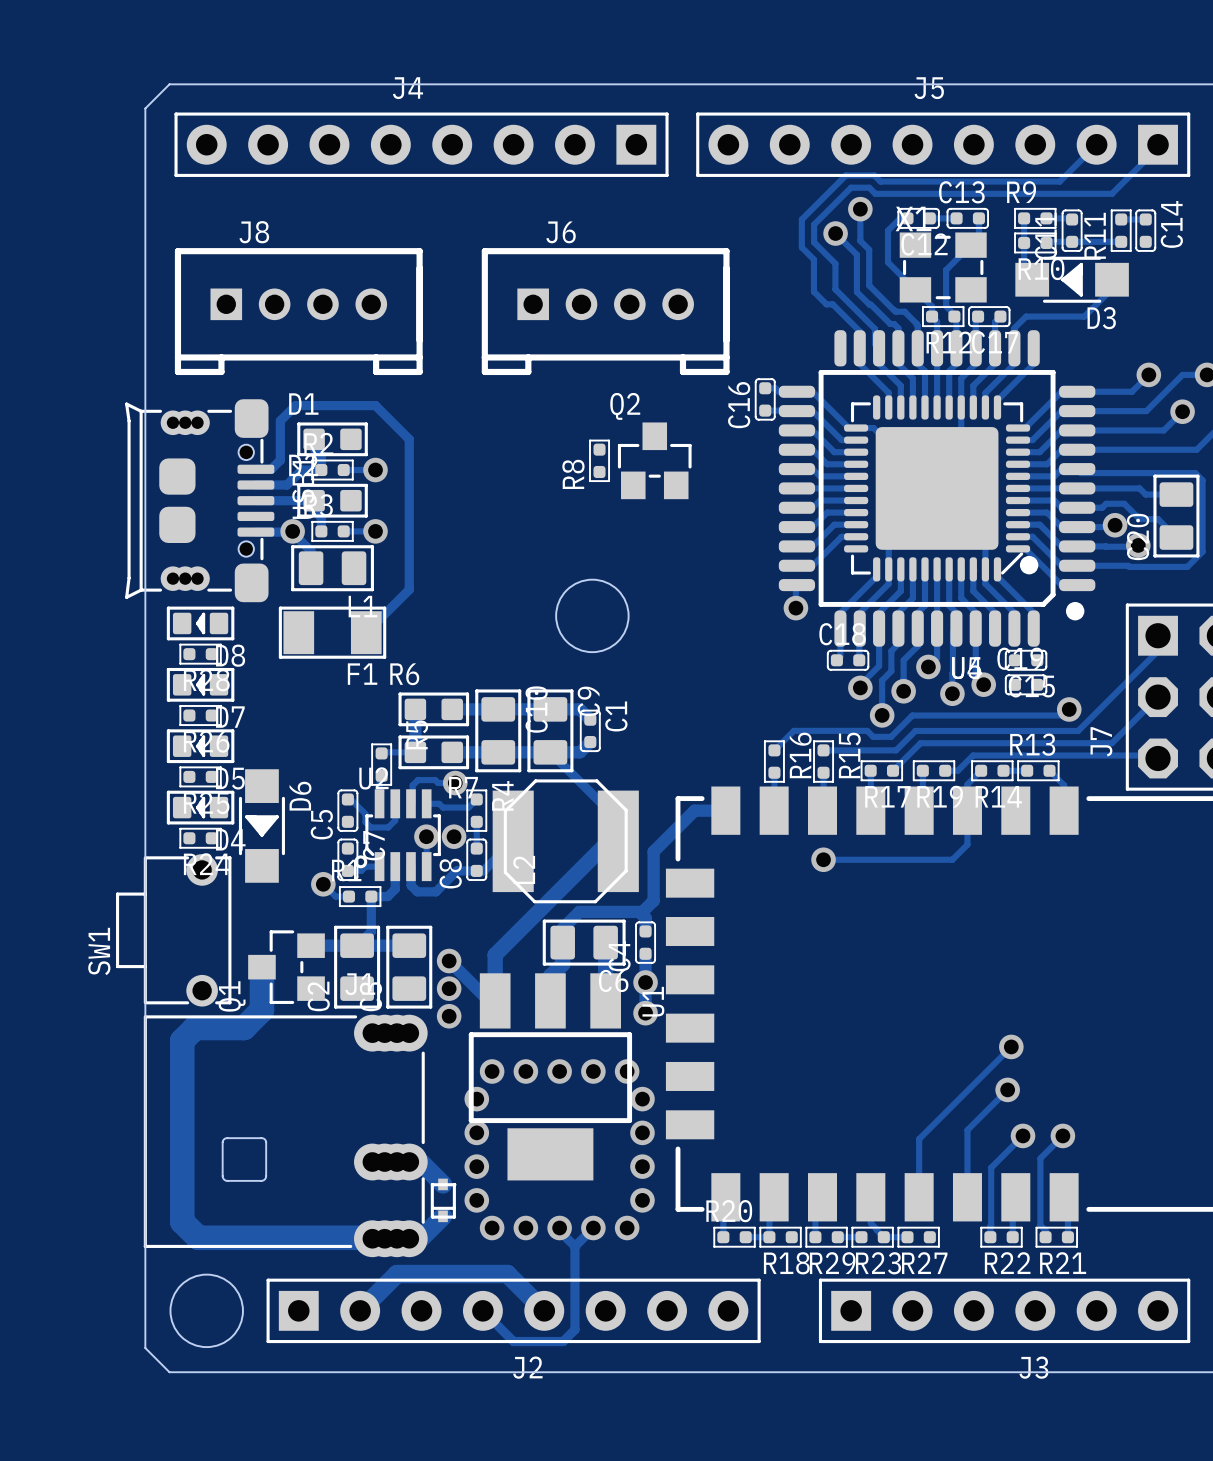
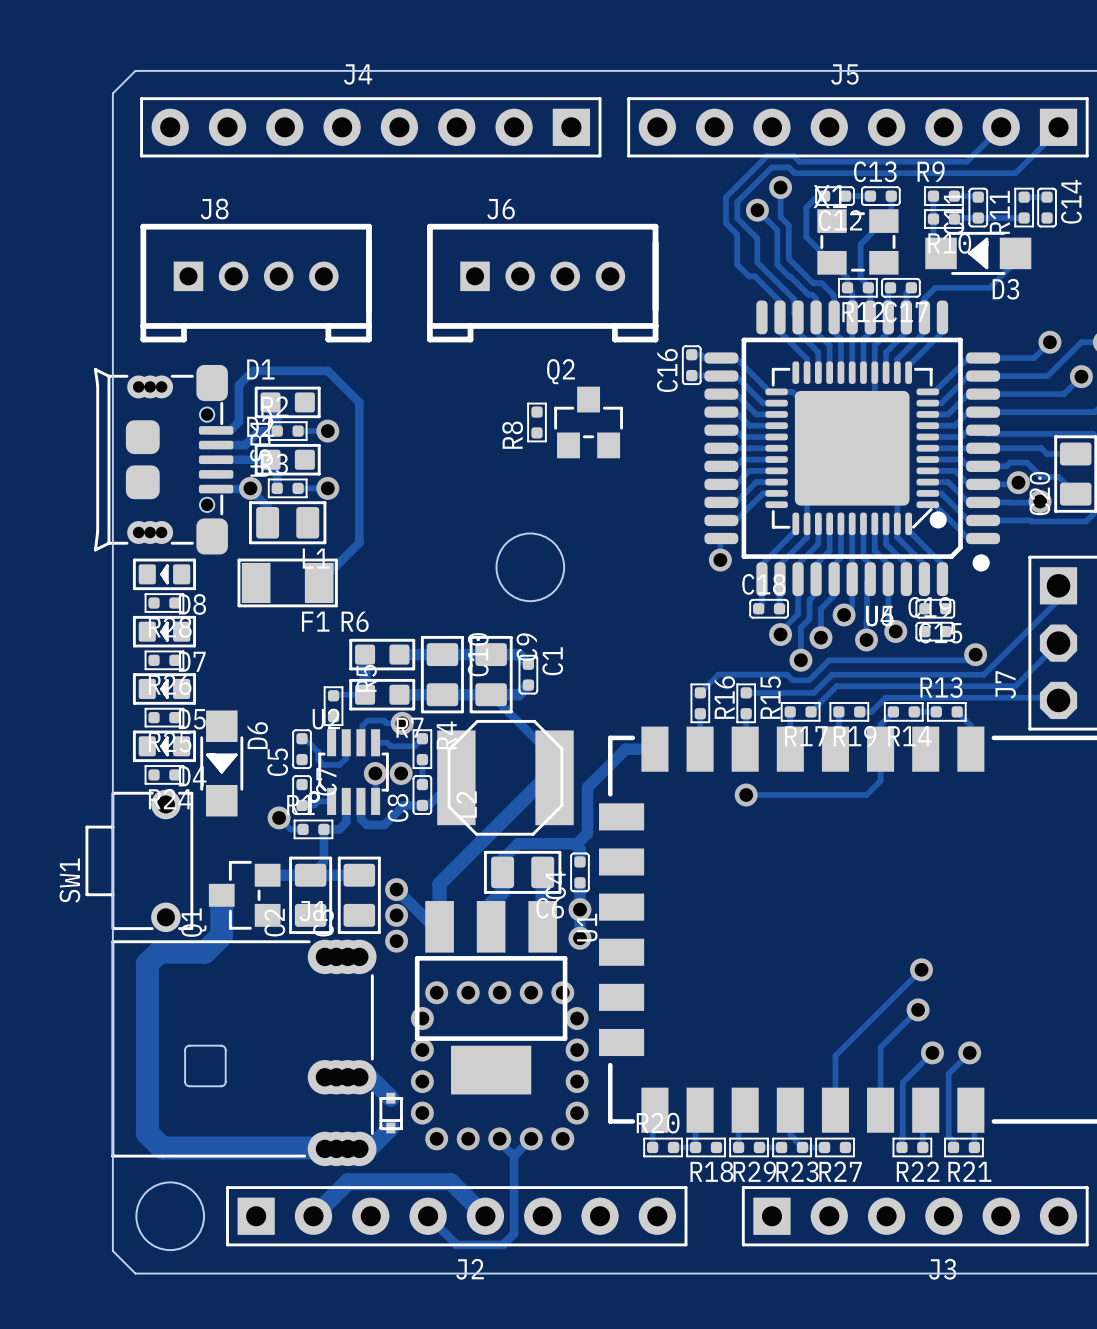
part footprint: [143, 1014, 428, 1258] -> [111, 939, 377, 1167]

